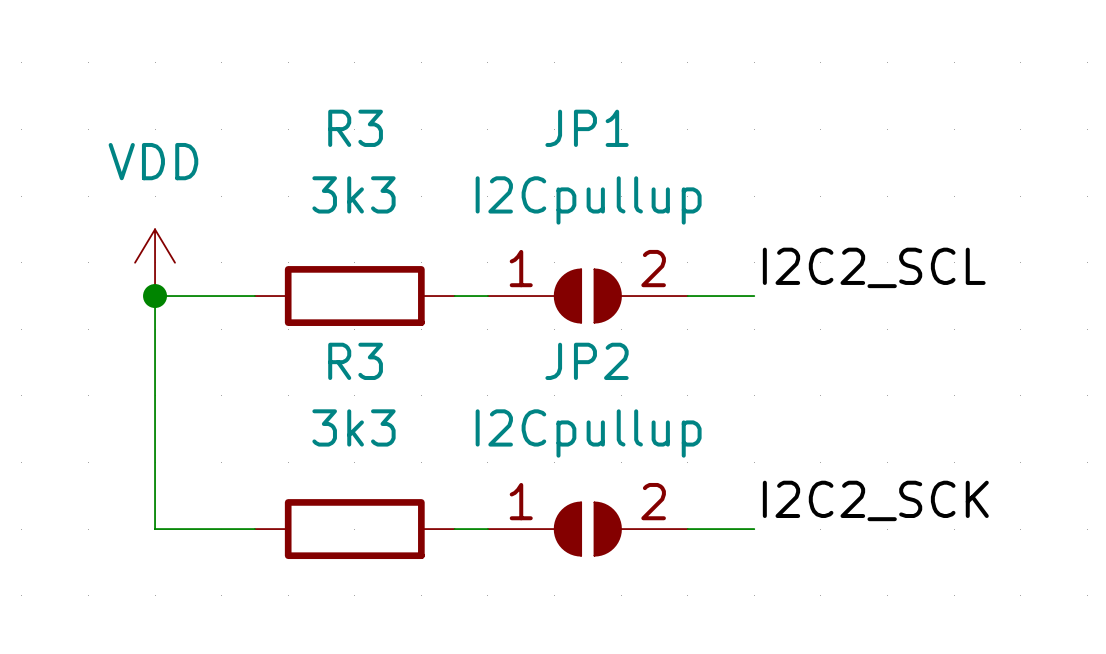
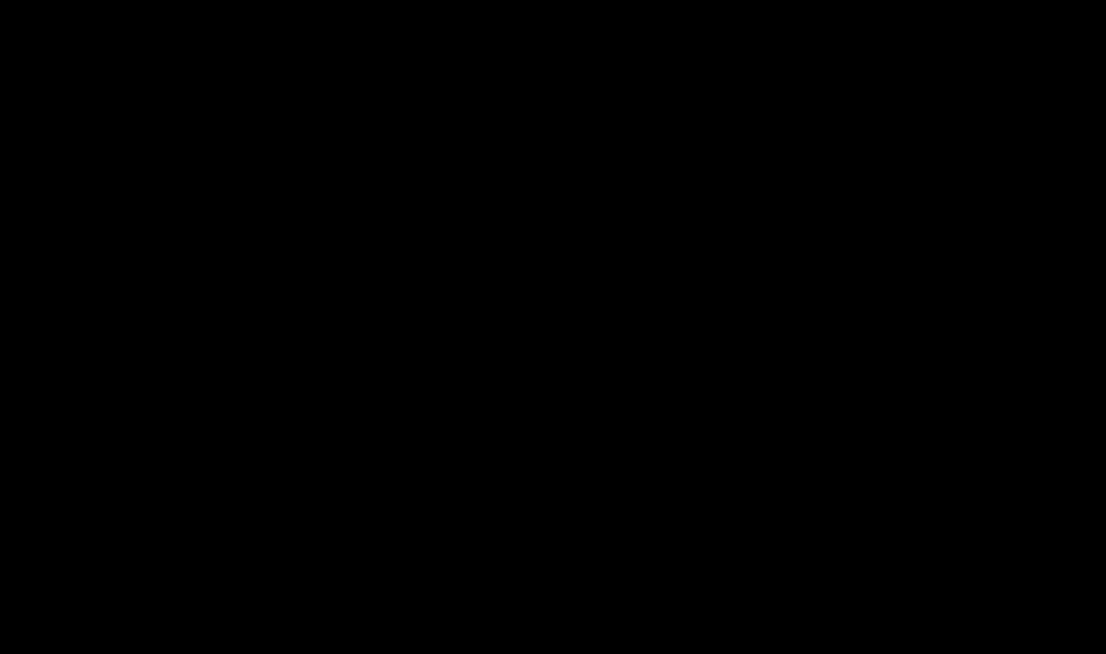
power symbol: VDD (155, 262) -> none
label: I2C2_SCL (874, 267) -> none
junction: (155, 296) -> none
wire: (254, 296) (155, 296) (155, 529) (254, 529) -> none
R3: 3k3 (354, 296) -> none
wire: (454, 296) (487, 296) -> none
JP1: I2Cpullup (587, 296) -> none
wire: (687, 296) (754, 296) -> none
label: I2C2_SCK (875, 500) -> none
R3: 3k3 (354, 529) -> none
wire: (454, 529) (487, 529) -> none
JP2: I2Cpullup (587, 529) -> none
wire: (687, 529) (754, 529) -> none

